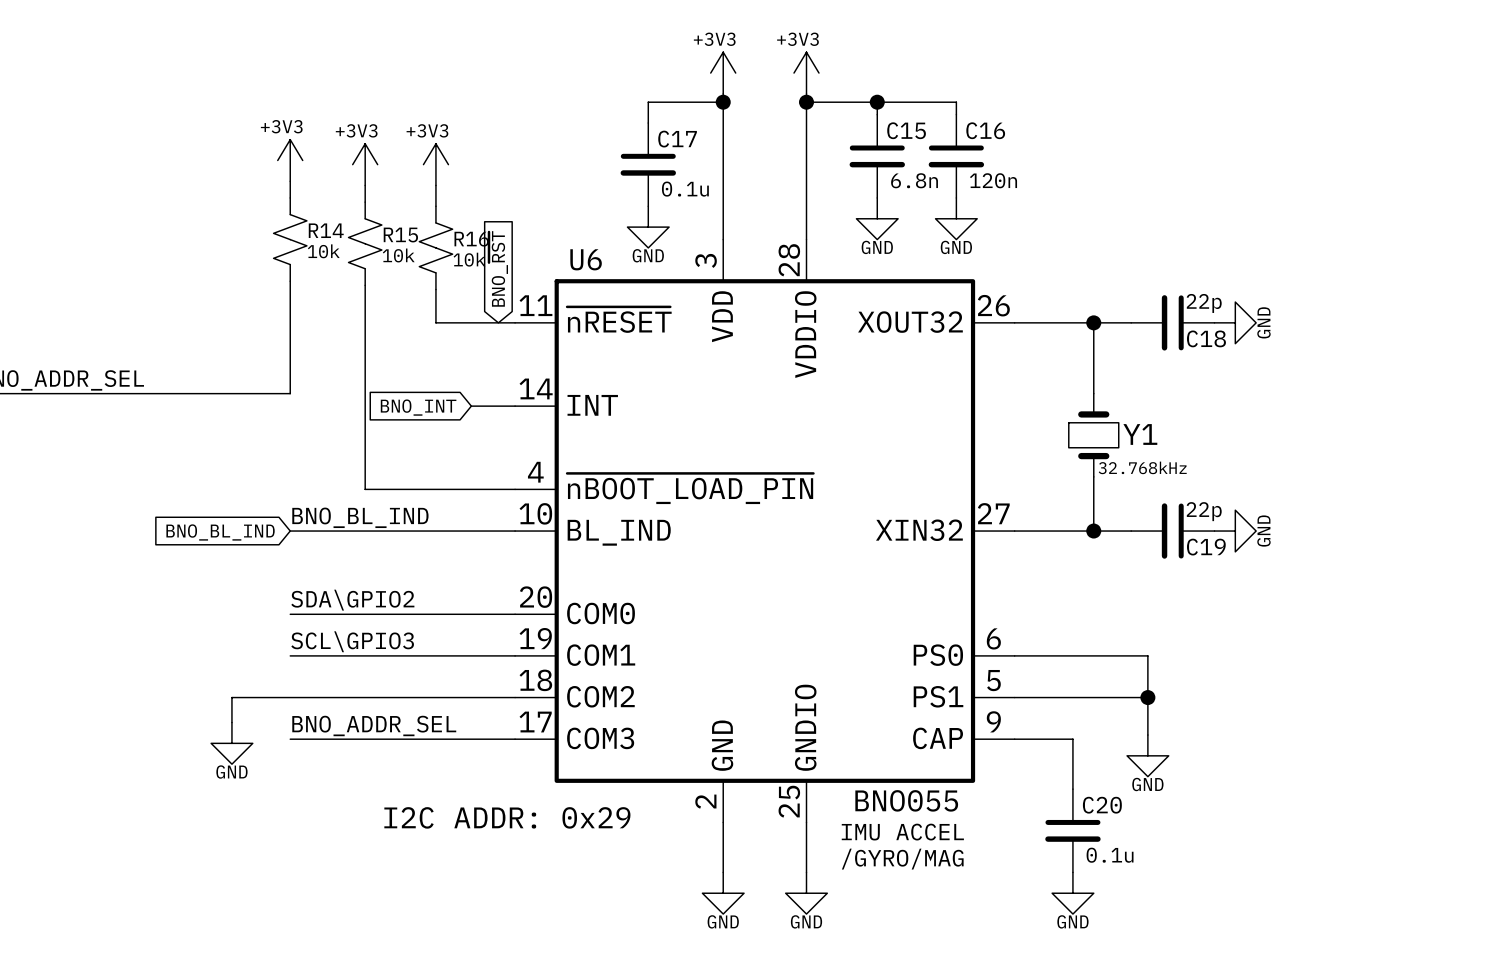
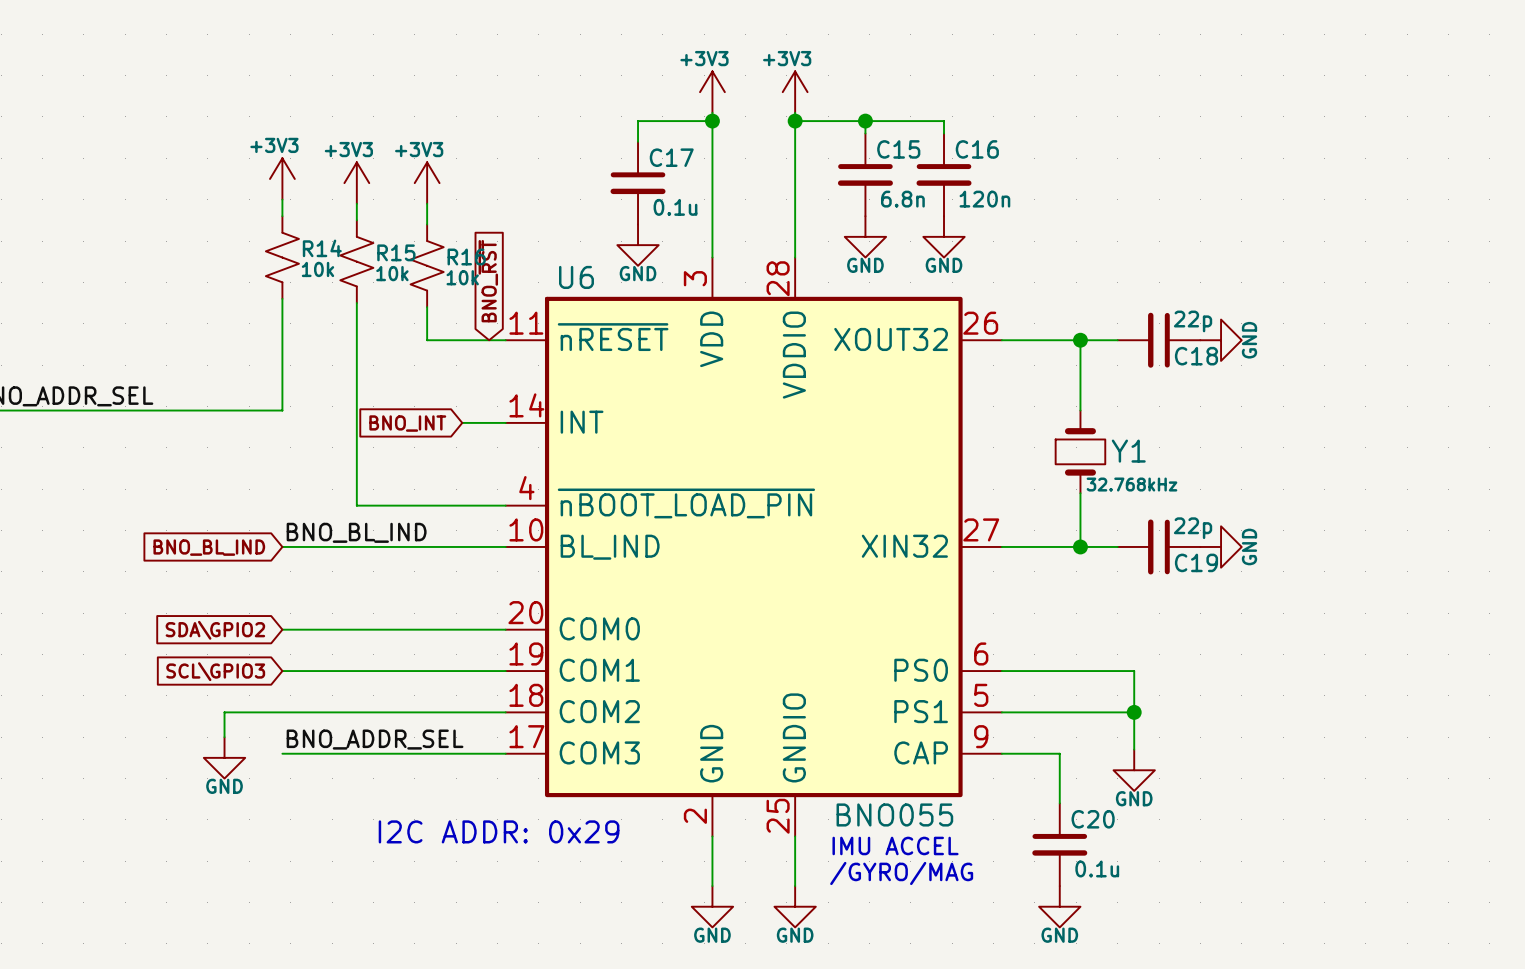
label: SDA\GPIO2 (352, 600) -> none
global label: none -> SDA\GPIO2 (215, 630)
label: SCL\GPIO3 (352, 641) -> none
global label: none -> SCL\GPIO3 (215, 671)

